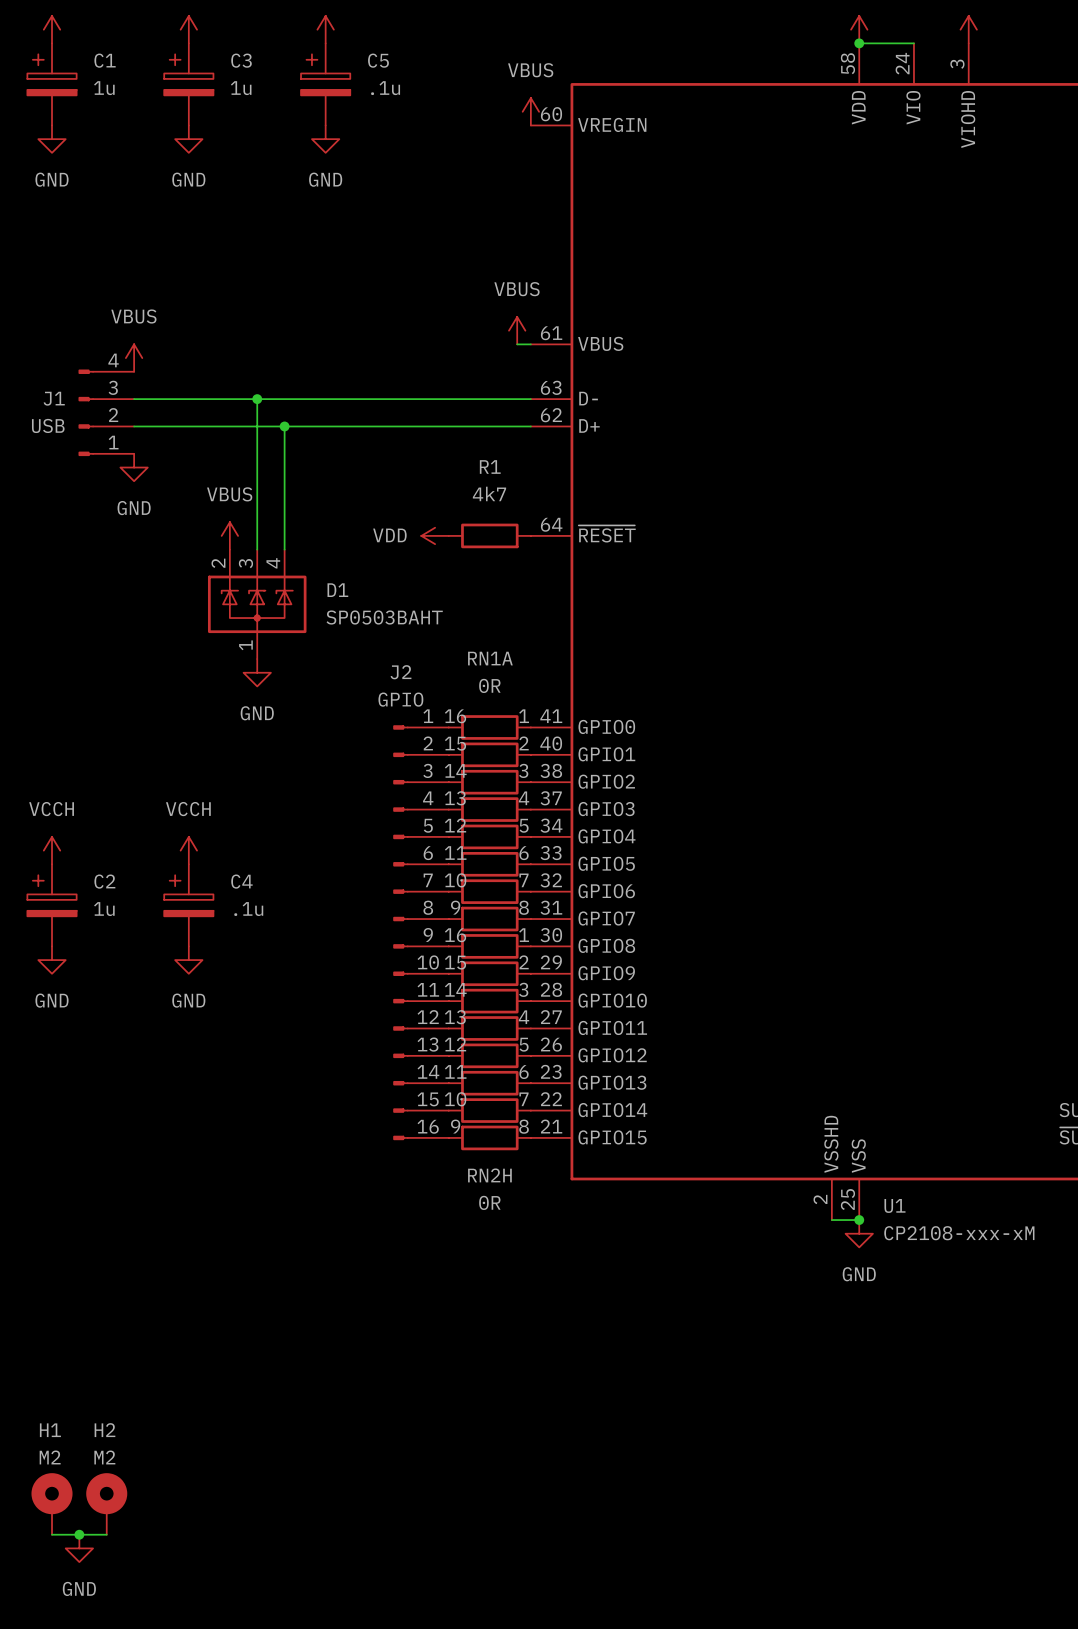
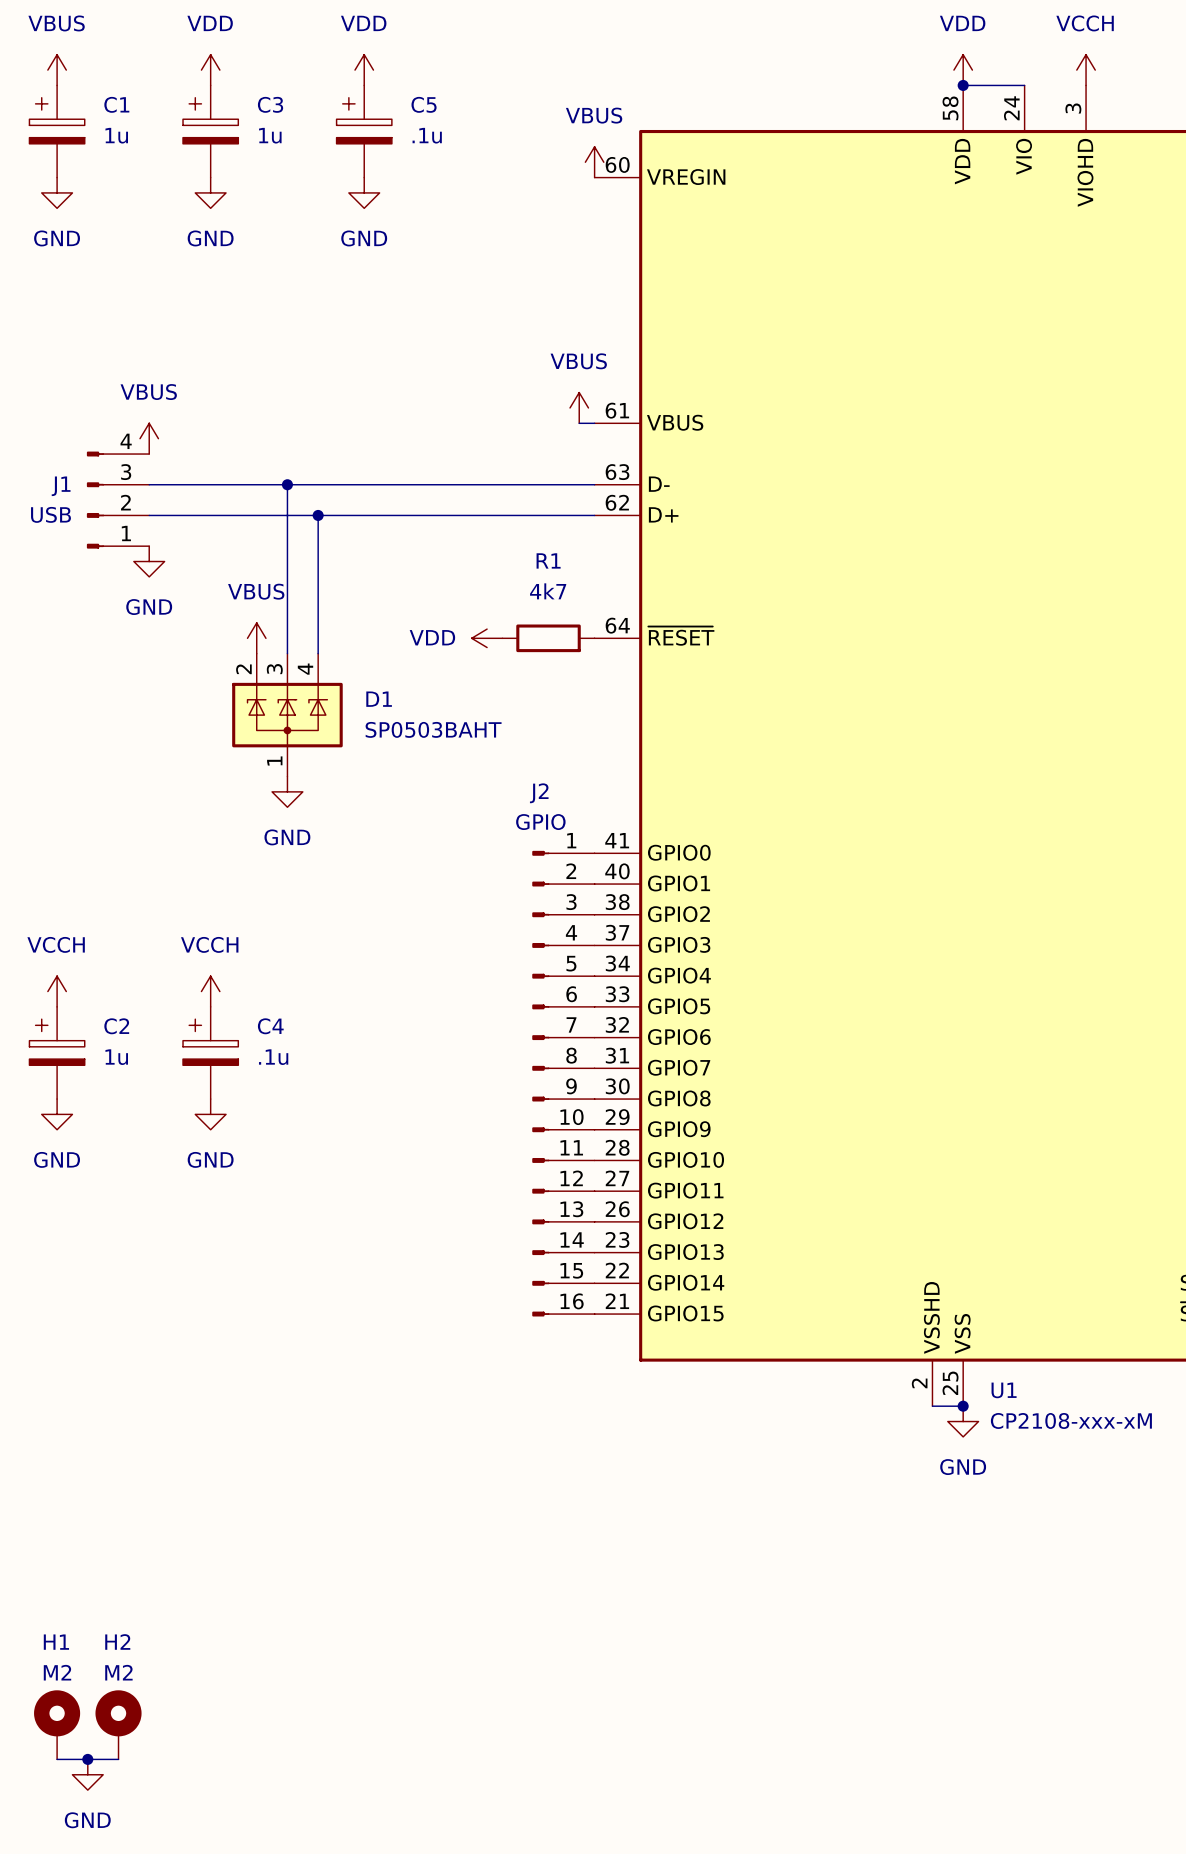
RN1A: 0R (489, 727) -> none
part: (489, 754) -> none
part: (489, 782) -> none
part: (489, 809) -> none
part: (489, 836) -> none
part: (489, 864) -> none
part: (489, 891) -> none
part: (489, 919) -> none
J2 position: (421, 932) -> (563, 1083)
part: (489, 946) -> none
part: (489, 973) -> none
part: (489, 1001) -> none
part: (489, 1028) -> none
part: (489, 1055) -> none
part: (489, 1083) -> none
part: (489, 1110) -> none
RN2H: 0R (489, 1137) -> none

